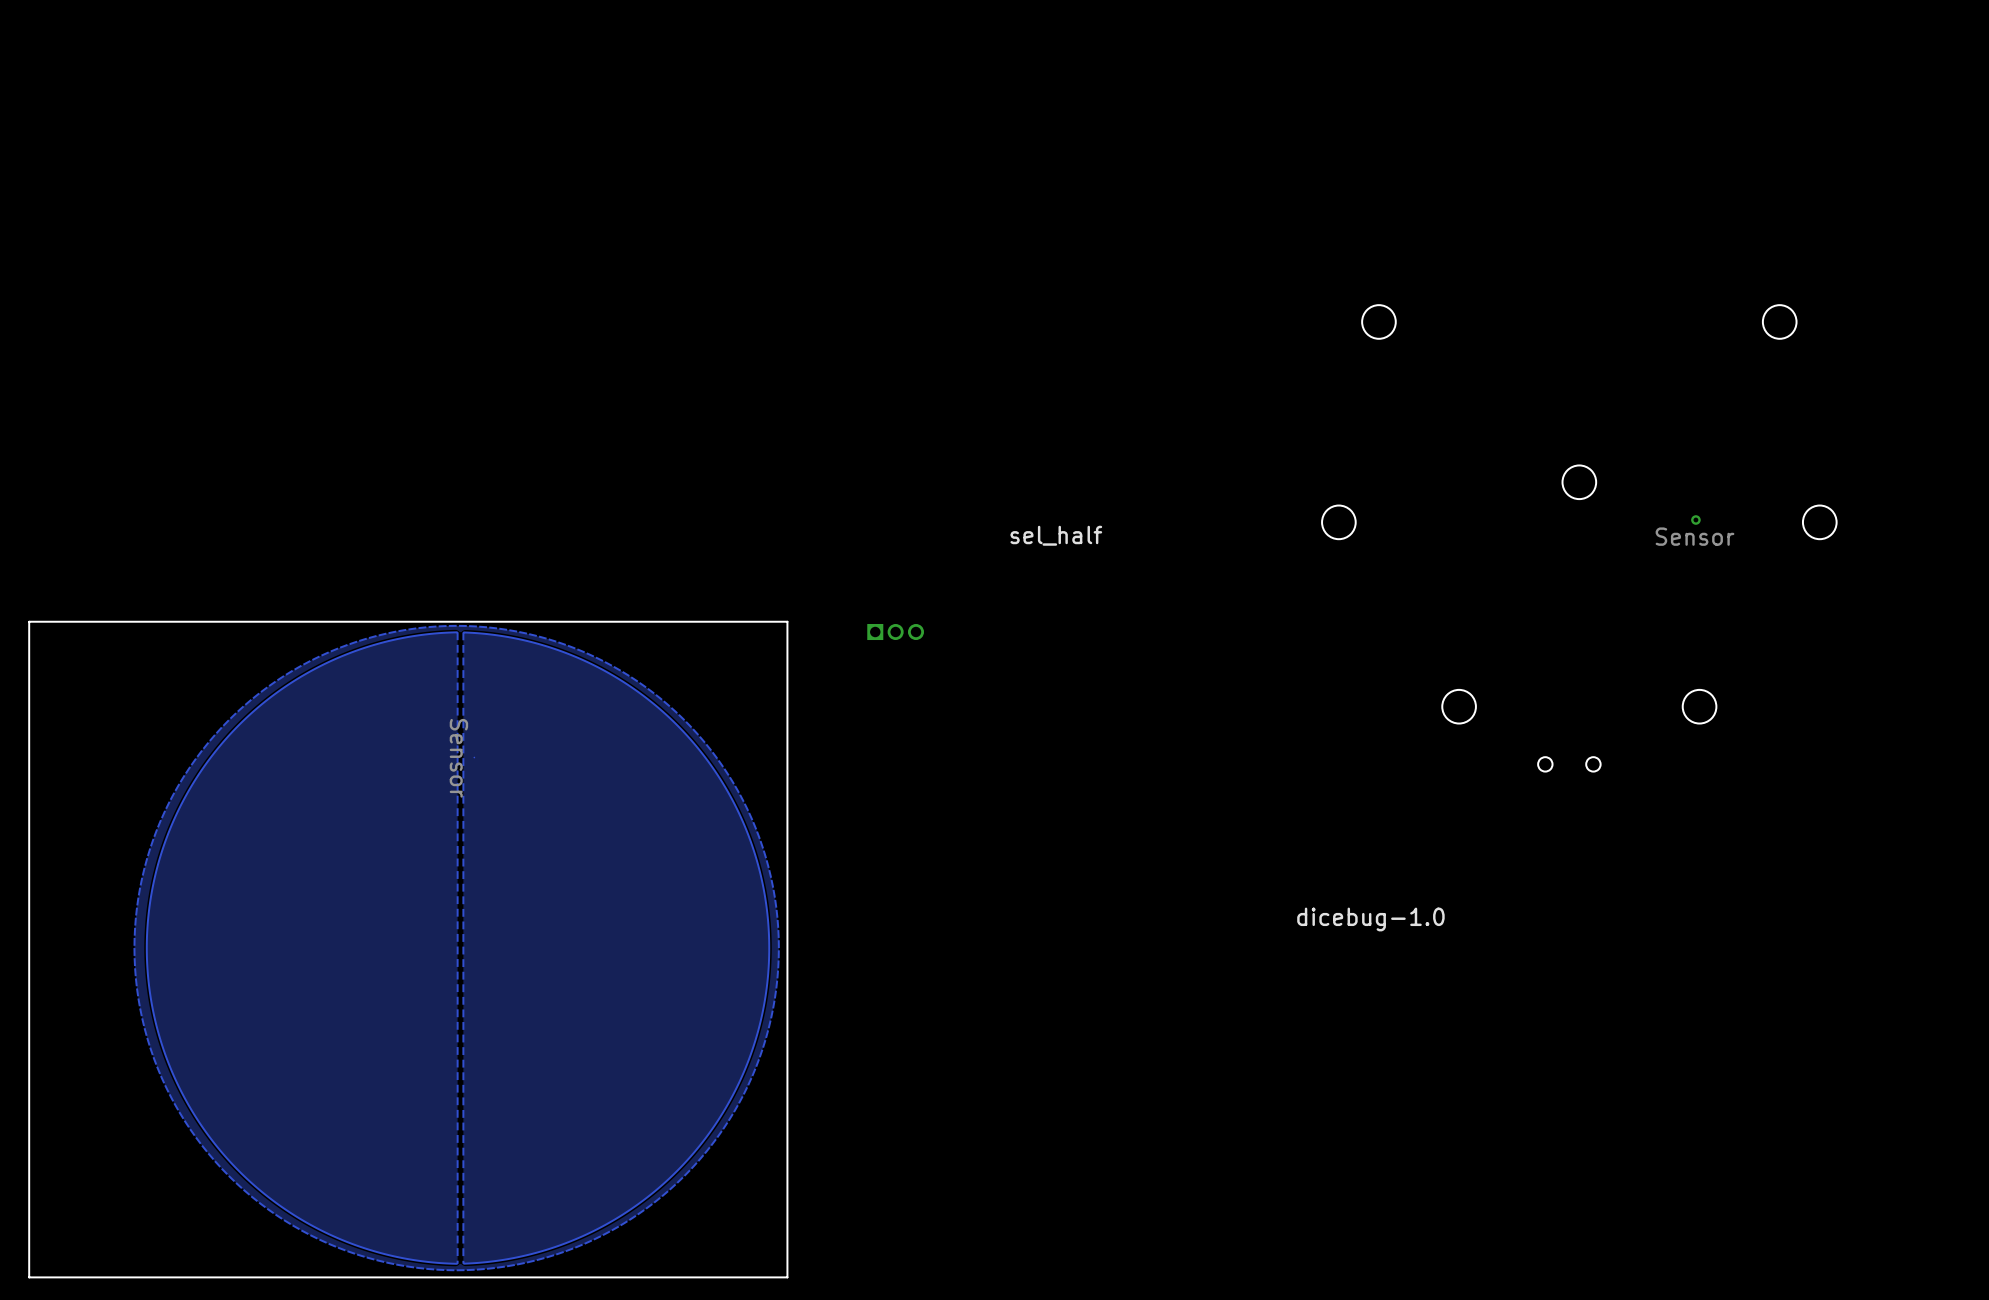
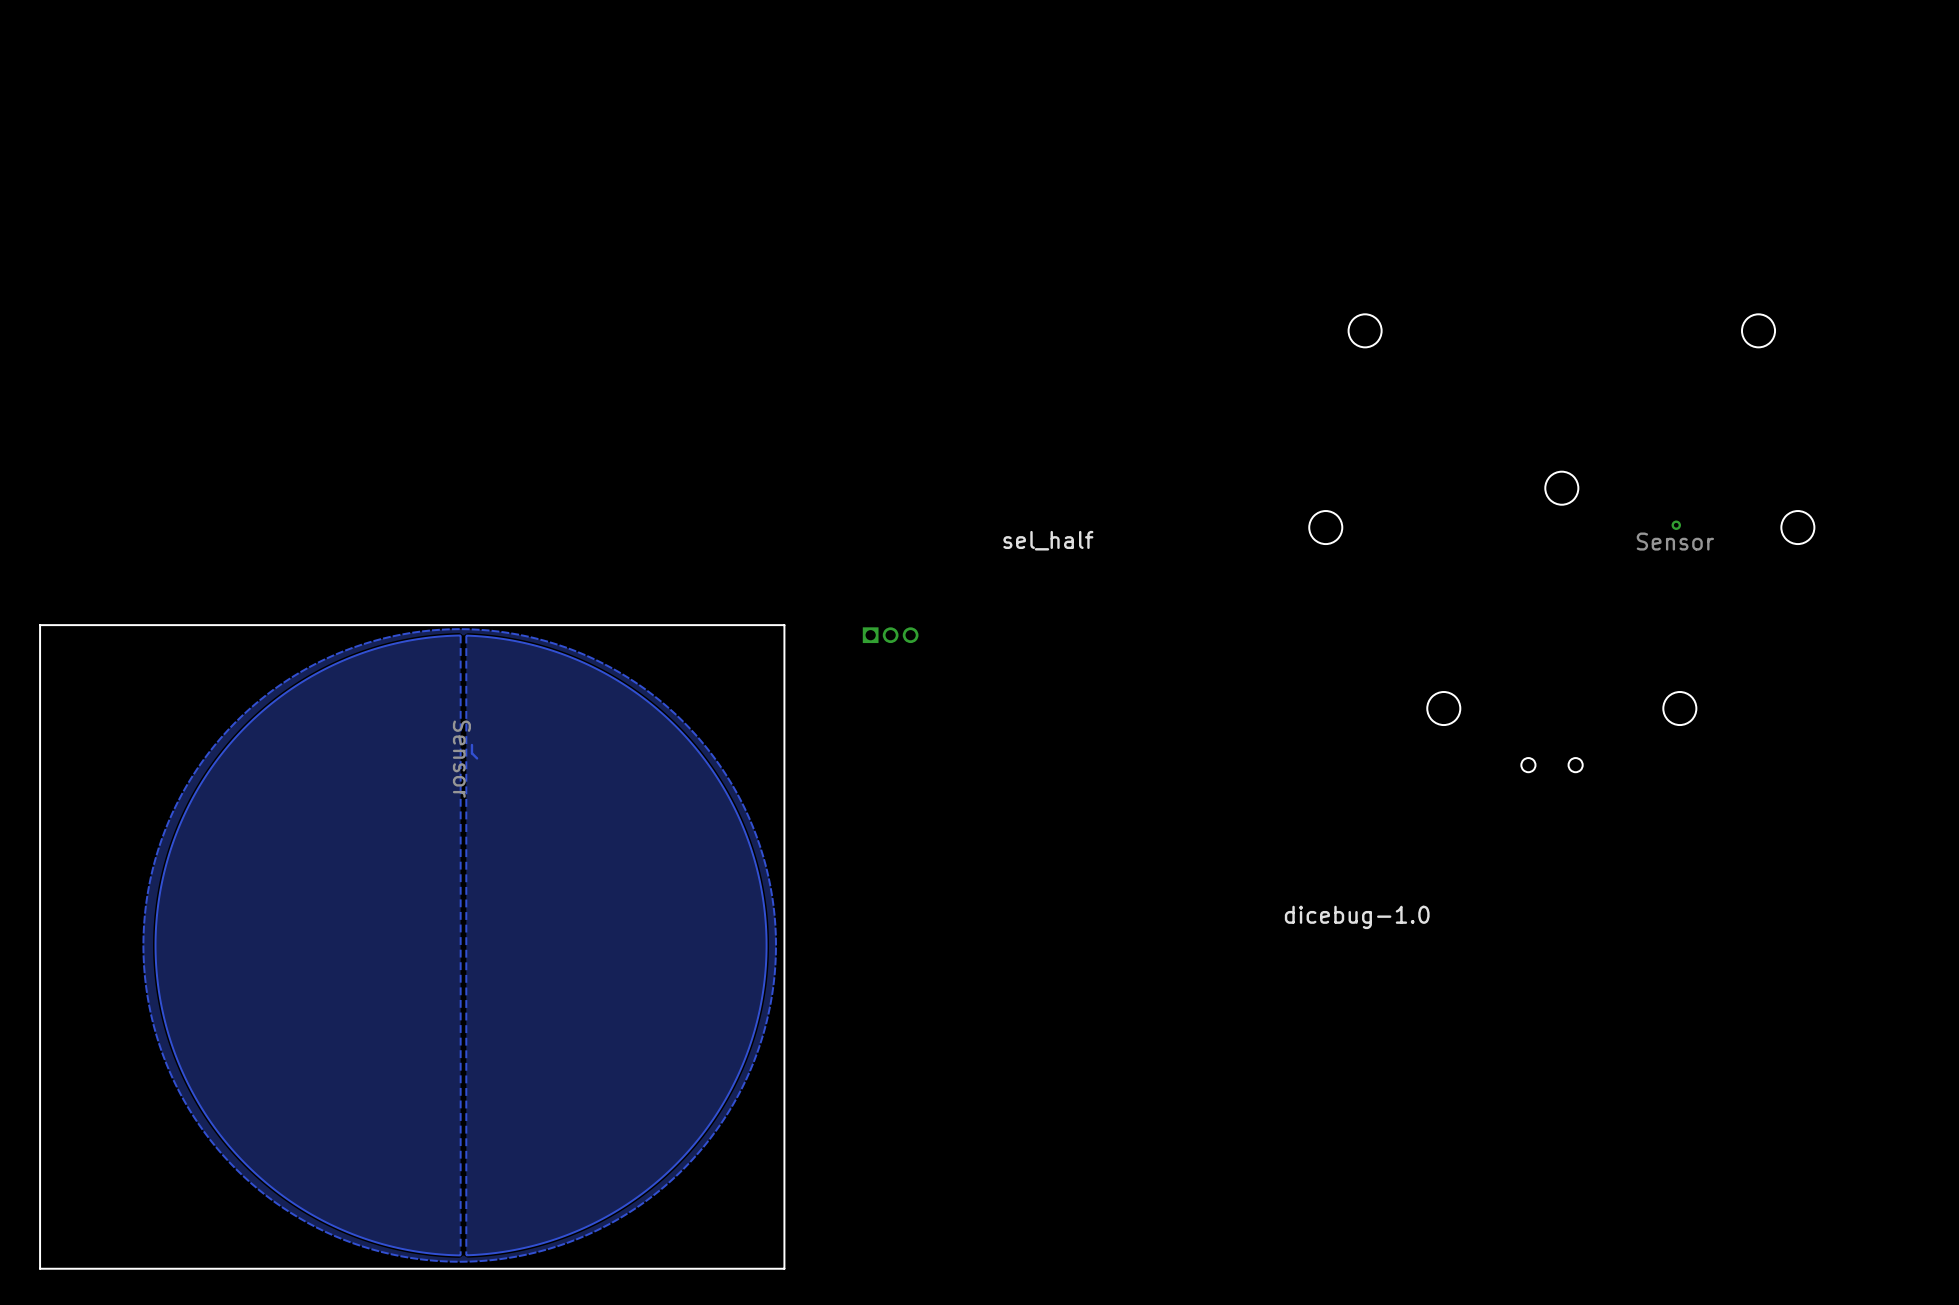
track: none -> (471, 744) (471, 753) (477, 758)

